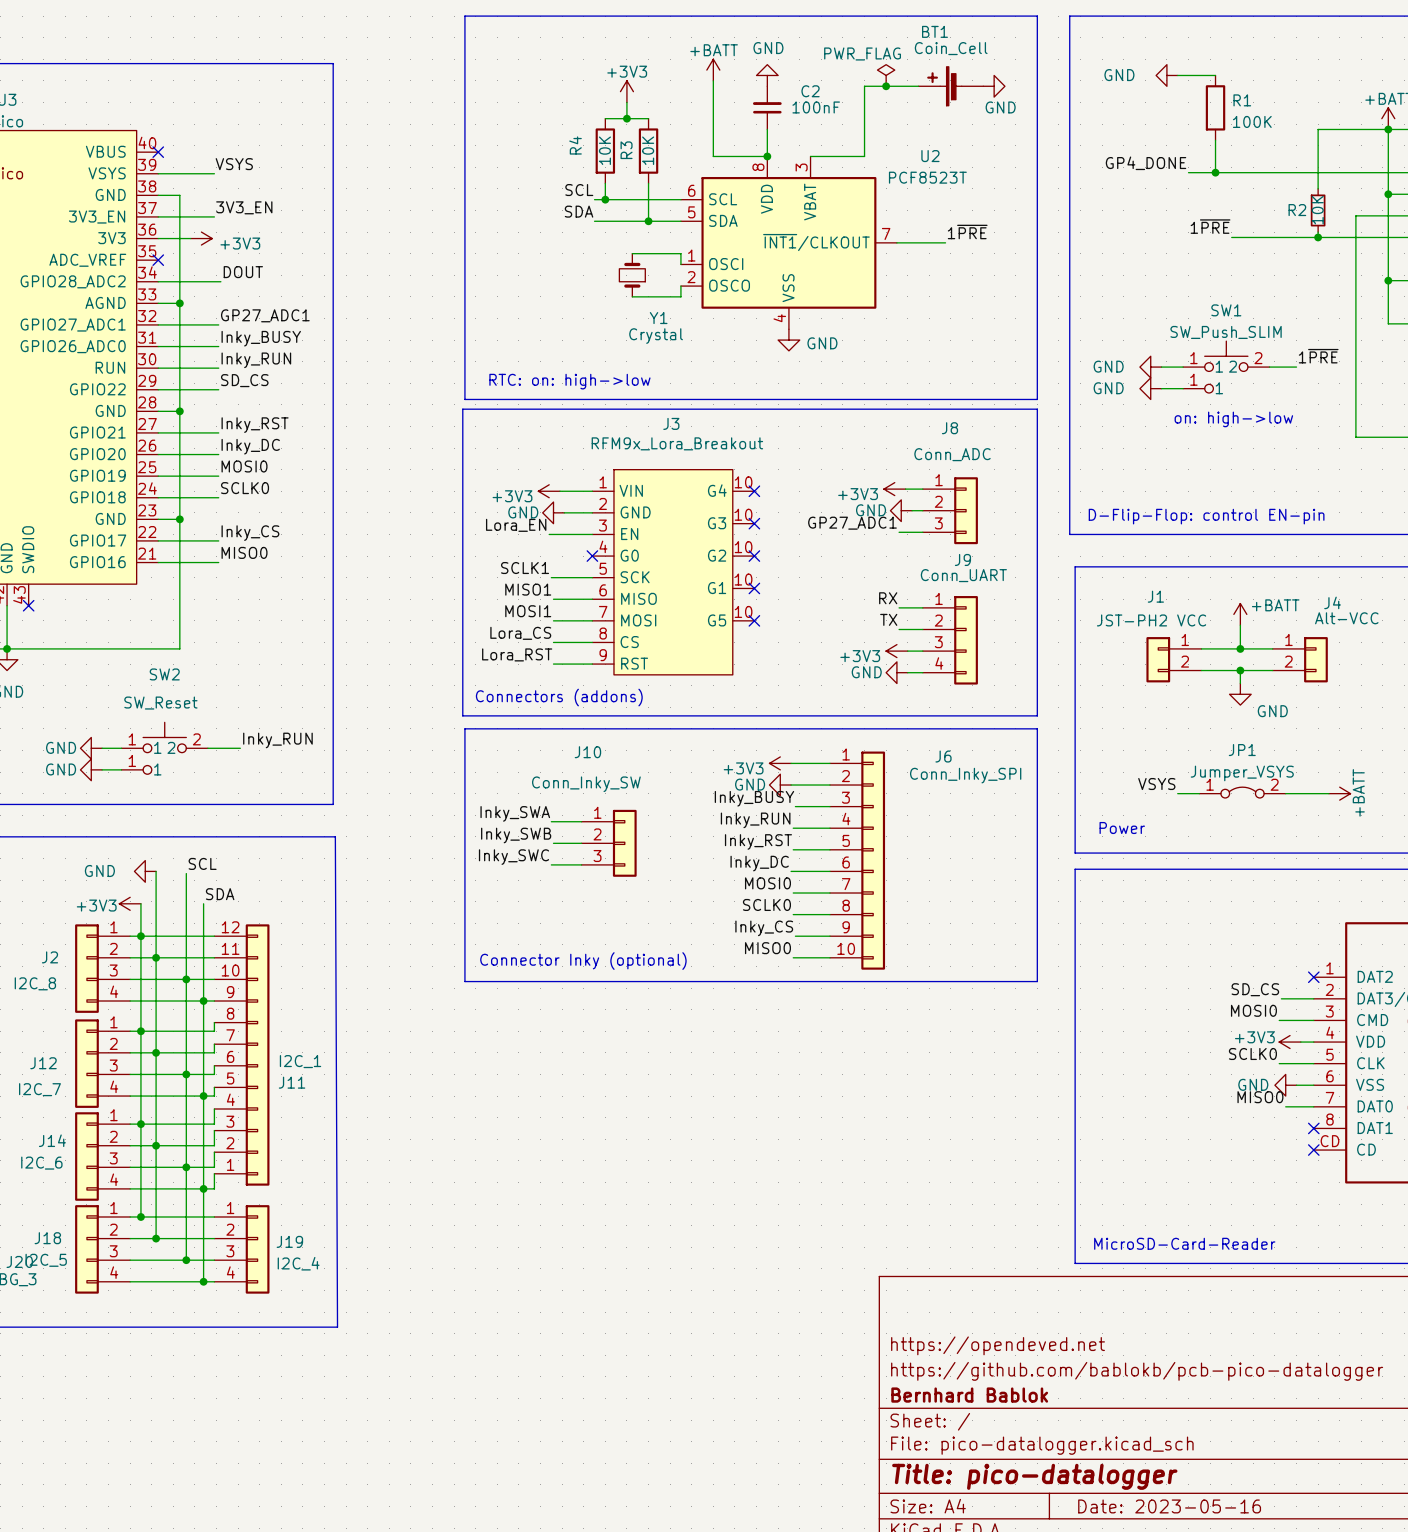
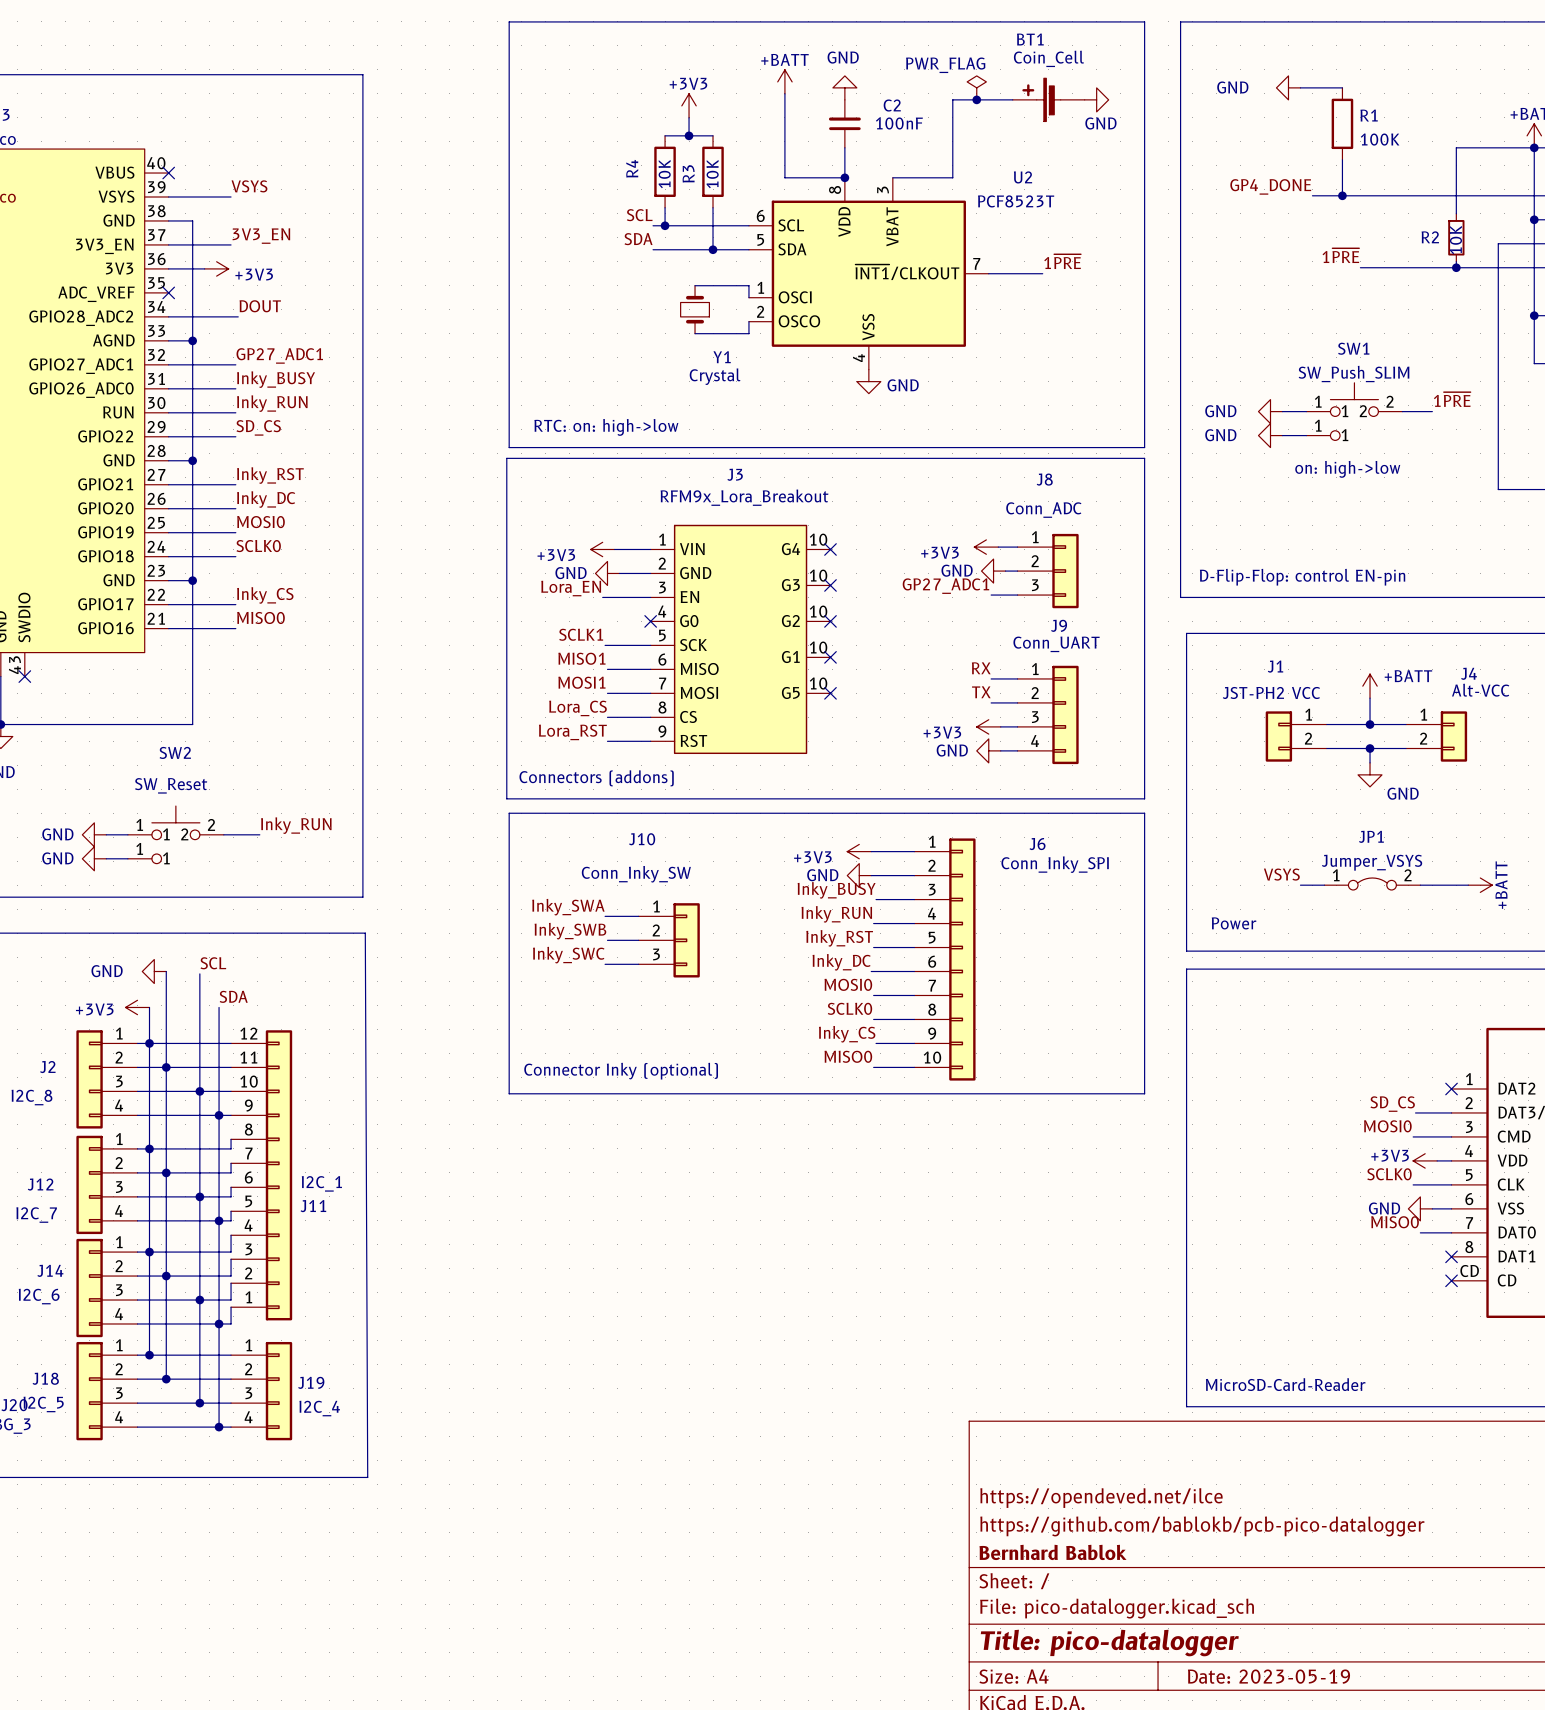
title block: https://opendeved.net (998, 1345) -> https://opendeved.net/ilce (1101, 1498)
title block: Date: 2023-05-16 (1169, 1506) -> Date: 2023-05-19 (1268, 1676)

